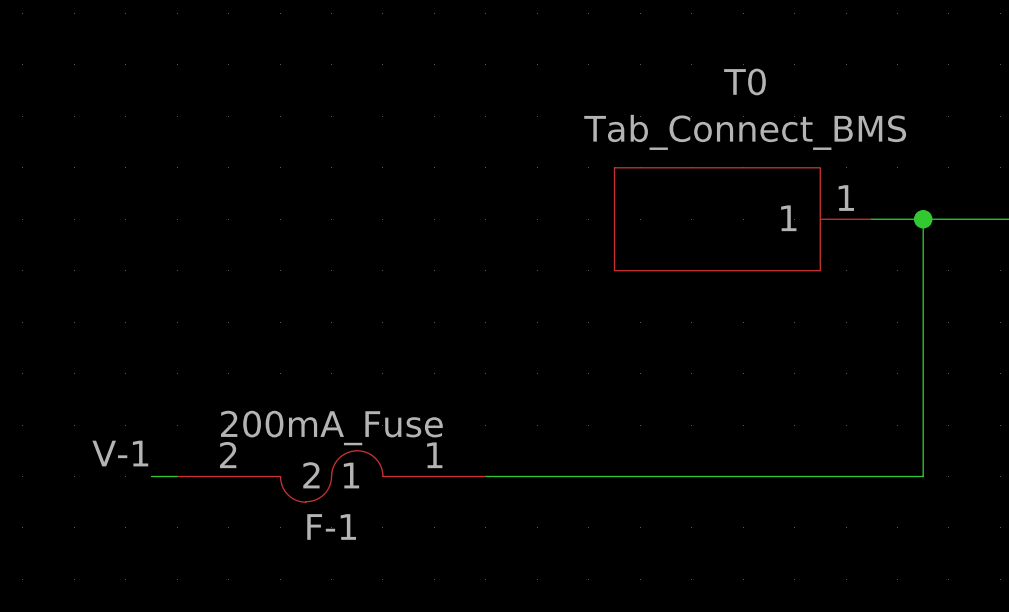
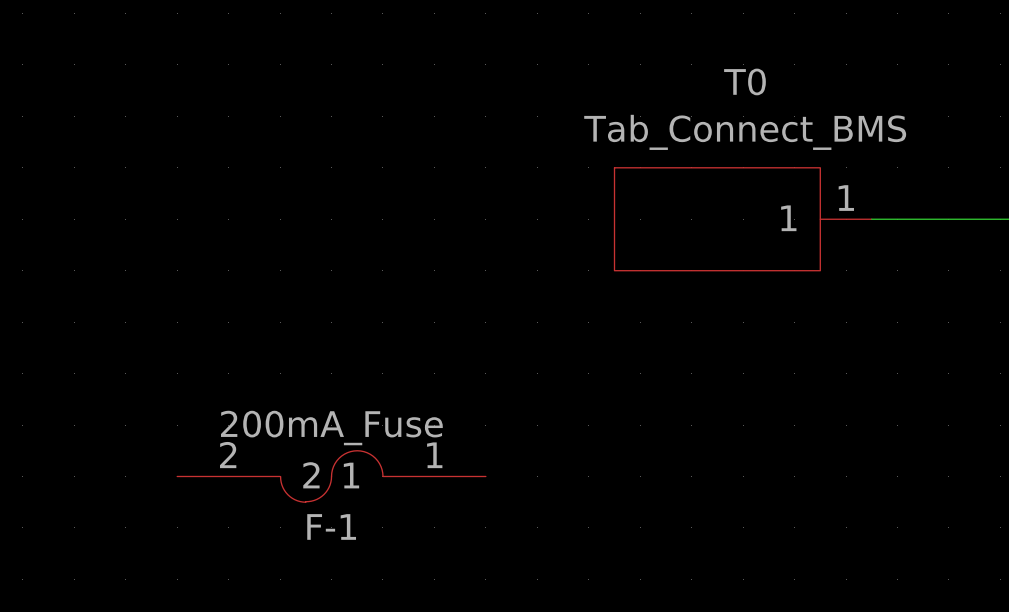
wire: (923, 219) (923, 476) (485, 476) -> none
junction: (923, 219) -> none
label: V-1 (120, 453) -> none
wire: (151, 476) (177, 476) -> none

